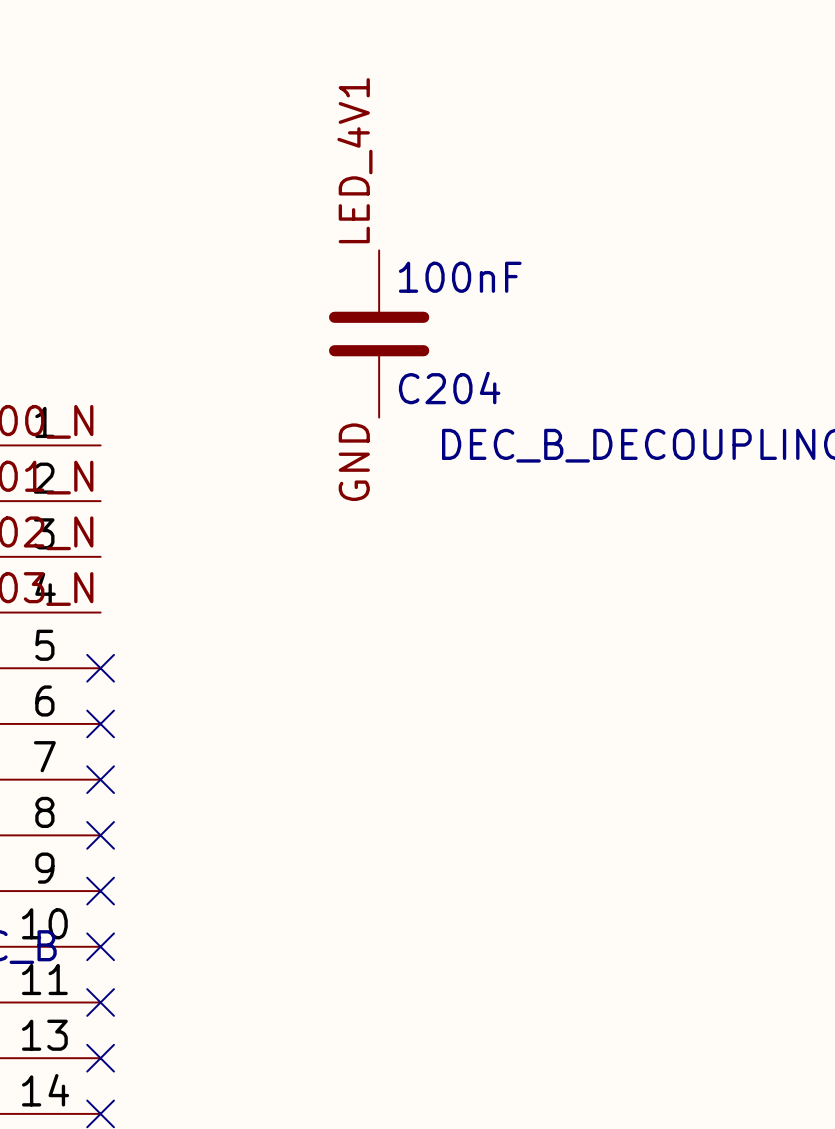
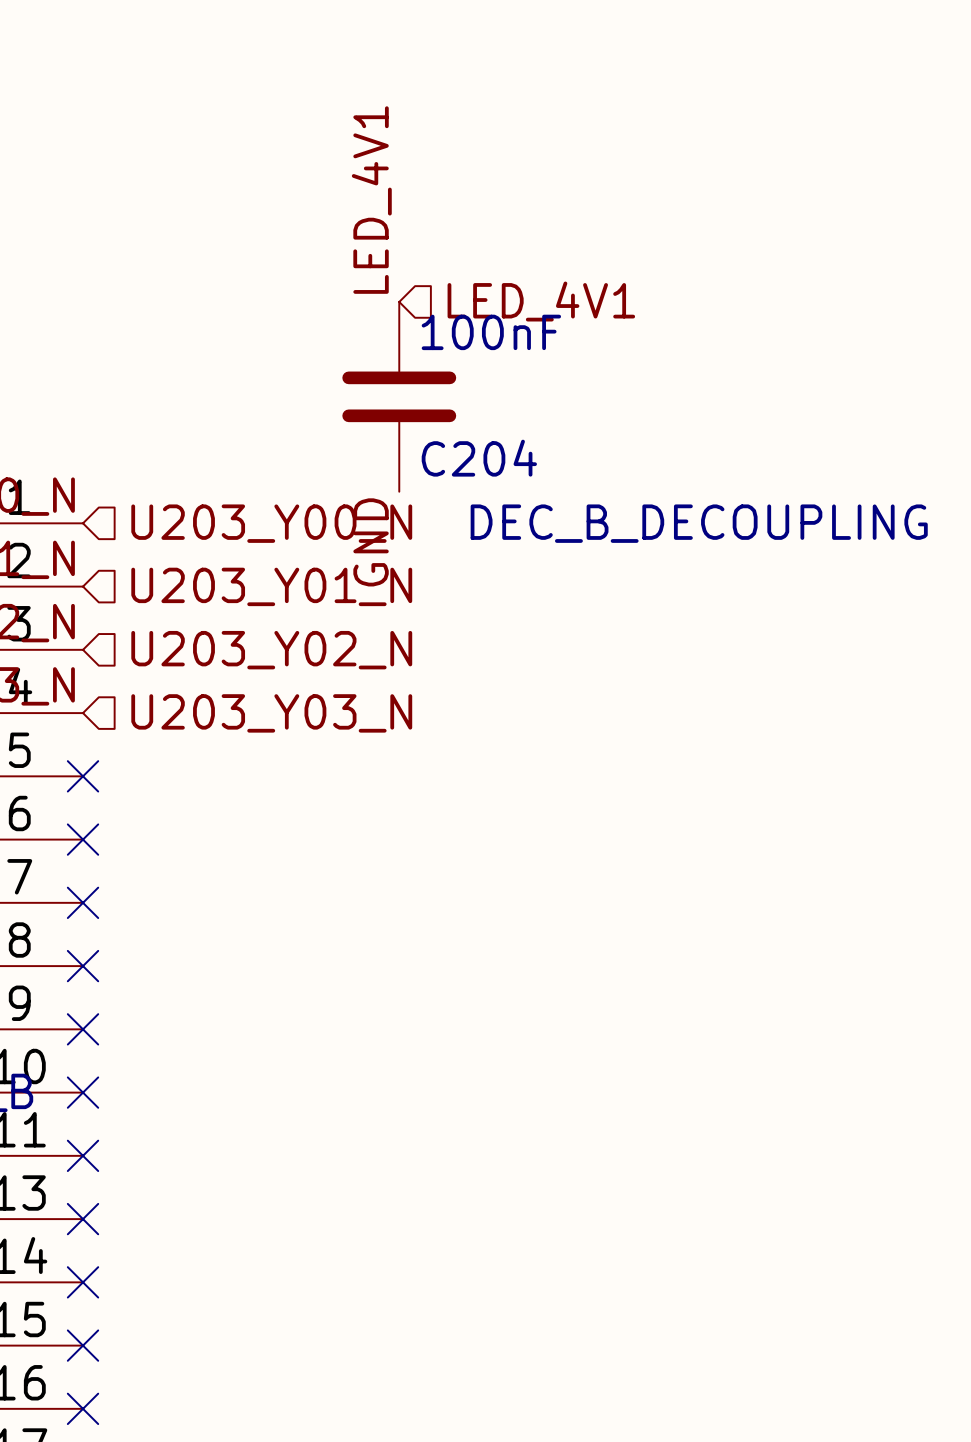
hierarchical label: none -> LED_4V1 (541, 301)
hierarchical label: none -> U203_Y00_N (271, 523)
hierarchical label: none -> U203_Y01_N (271, 586)
hierarchical label: none -> U203_Y02_N (271, 650)
hierarchical label: none -> U203_Y03_N (271, 713)

